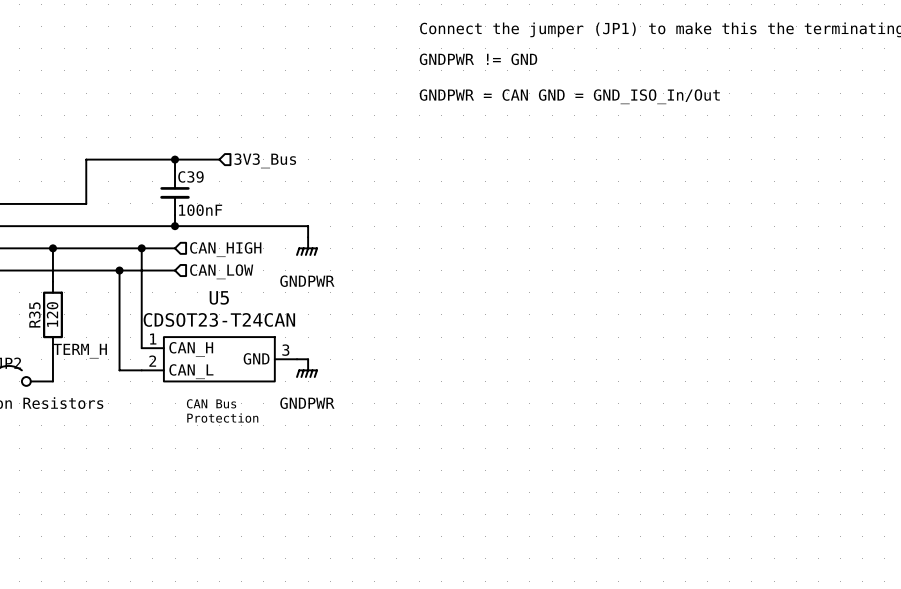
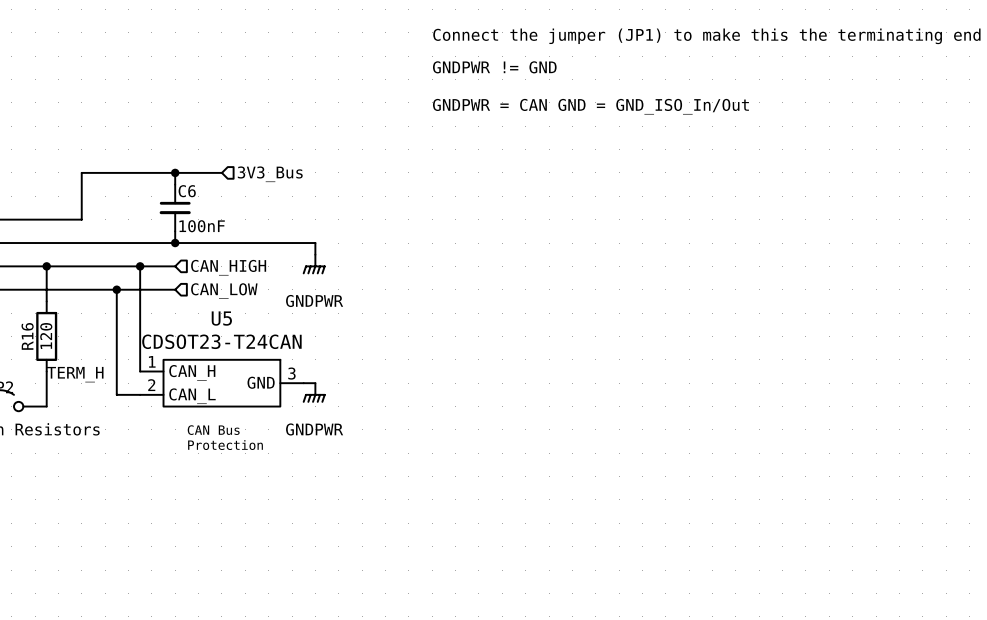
C39 name: C39 (190, 176) -> C6 (187, 191)
R35 name: R35 (34, 314) -> R16 (27, 336)

